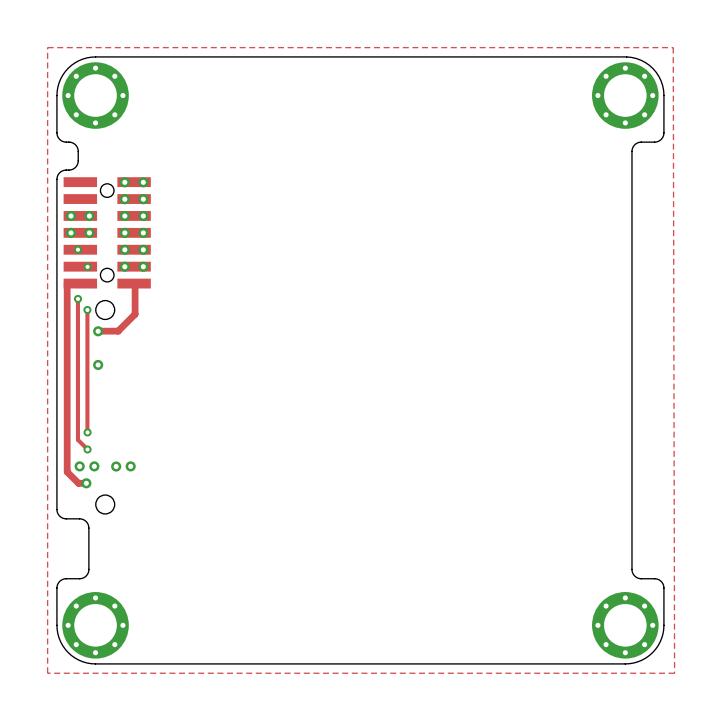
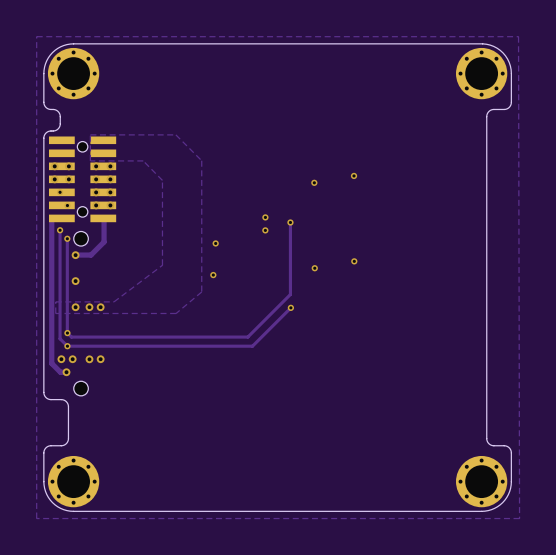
zone outline: none -> (90, 134) (90, 160) (143, 160) (162, 180) (162, 265) (113, 301) (55, 301) (55, 313) (176, 313) (201, 291) (201, 160) (175, 134) (90, 134)
via: (124, 182) -> none
via: (143, 182) -> none
via: (124, 199) -> none
via: (143, 199) -> none
via: none -> (354, 175)
via: none -> (314, 182)
via: none -> (265, 217)
track: none -> (290, 222) (290, 294) (247, 337) (71, 337) (67, 333)
via: none -> (290, 222)
via: none -> (265, 230)
via: none -> (215, 243)
via: none -> (354, 261)
via: none -> (314, 268)
via: none -> (213, 275)
via: none -> (75, 307)
via: none -> (89, 307)
via: none -> (100, 307)
track: none -> (290, 307) (252, 346) (67, 346)
via: none -> (290, 307)

